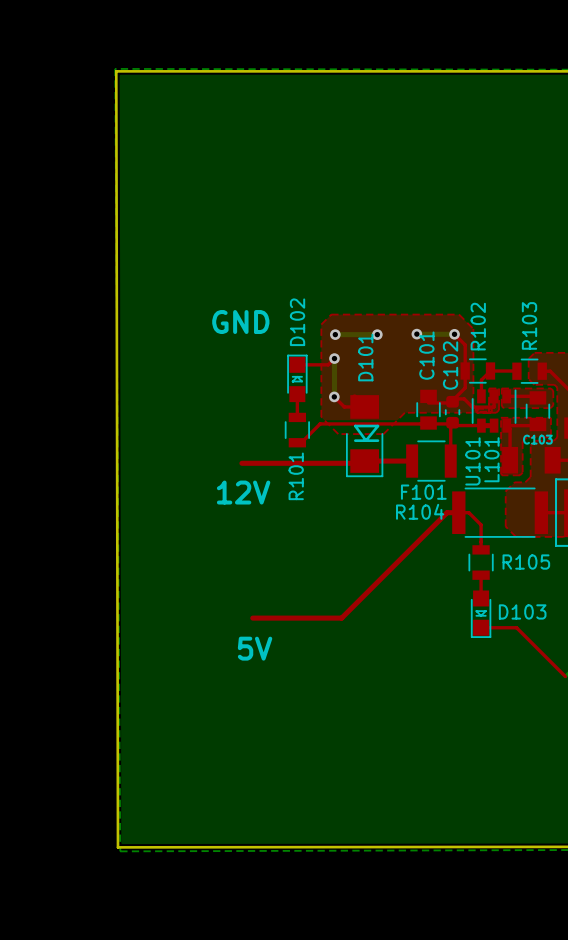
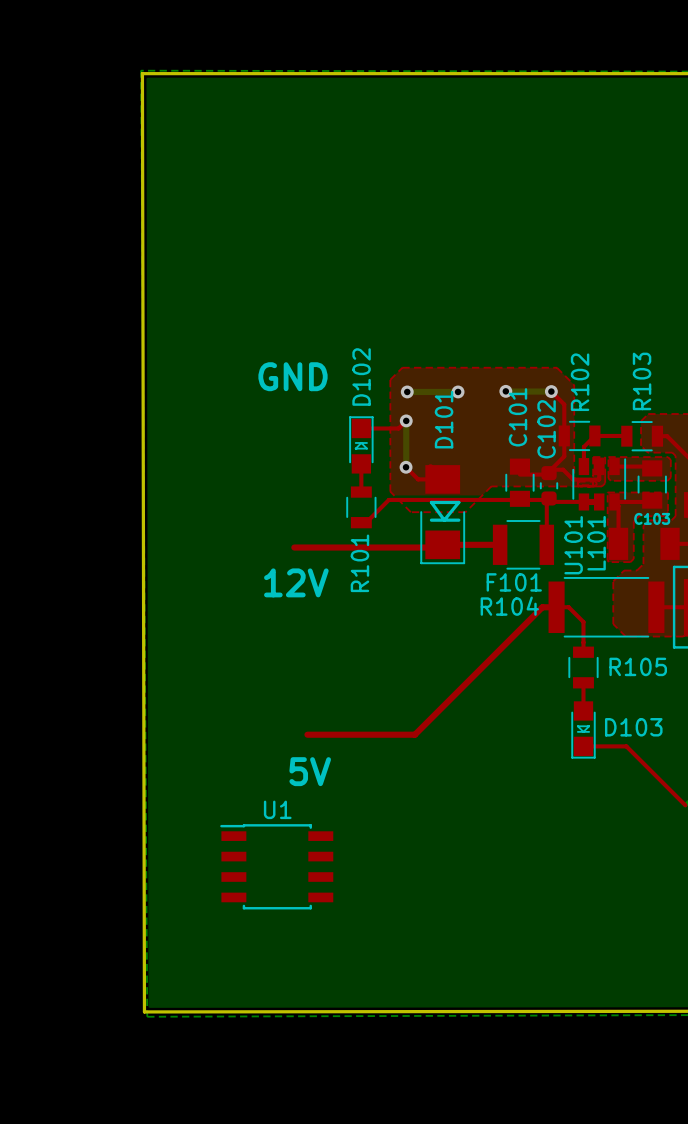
U1: none -> (276, 866)

